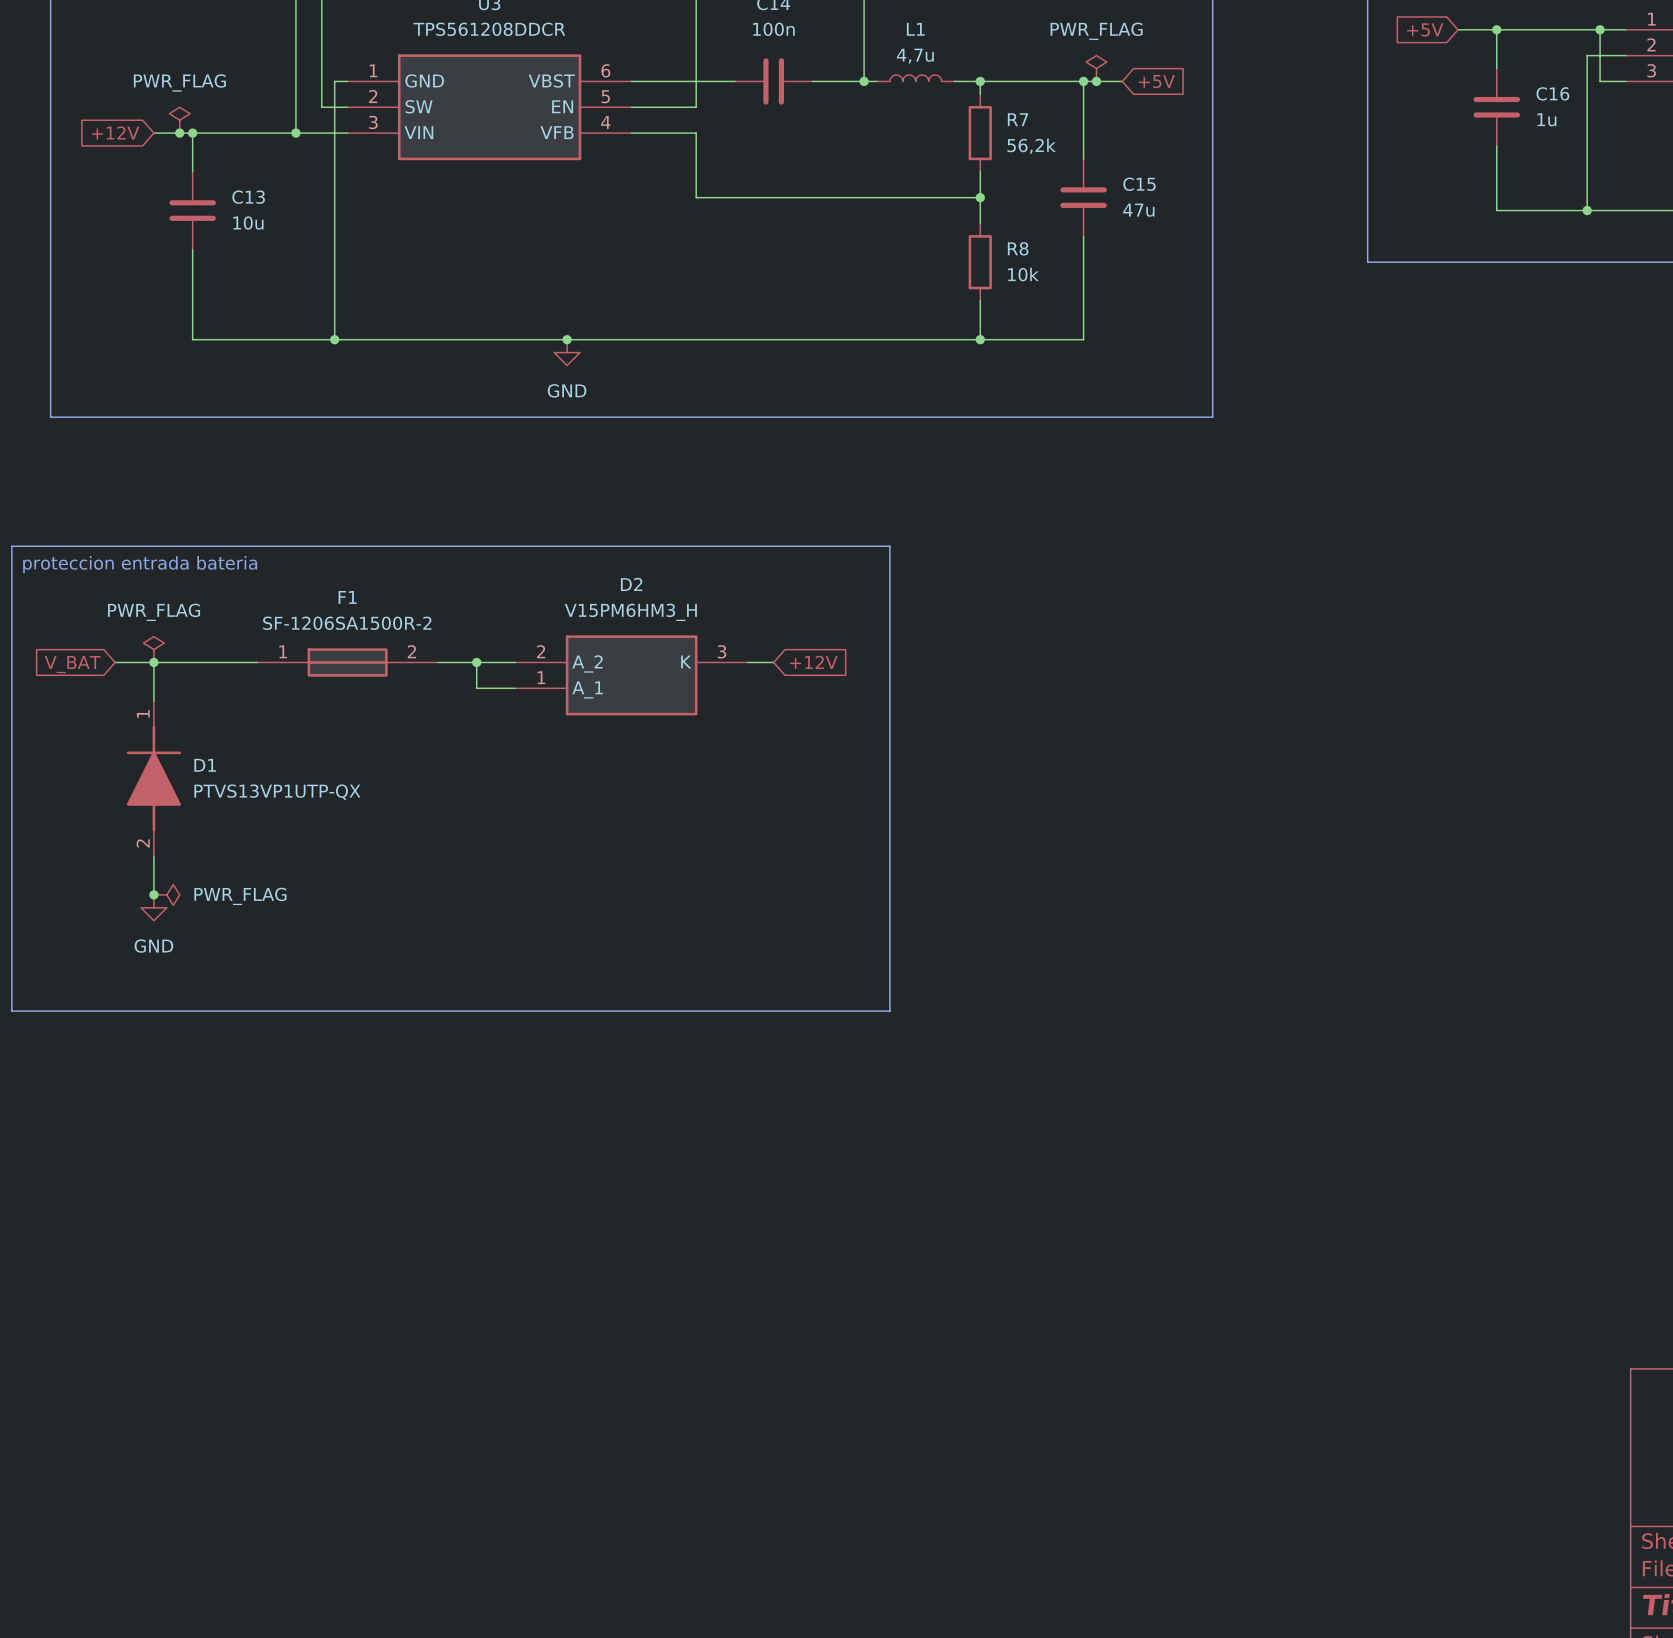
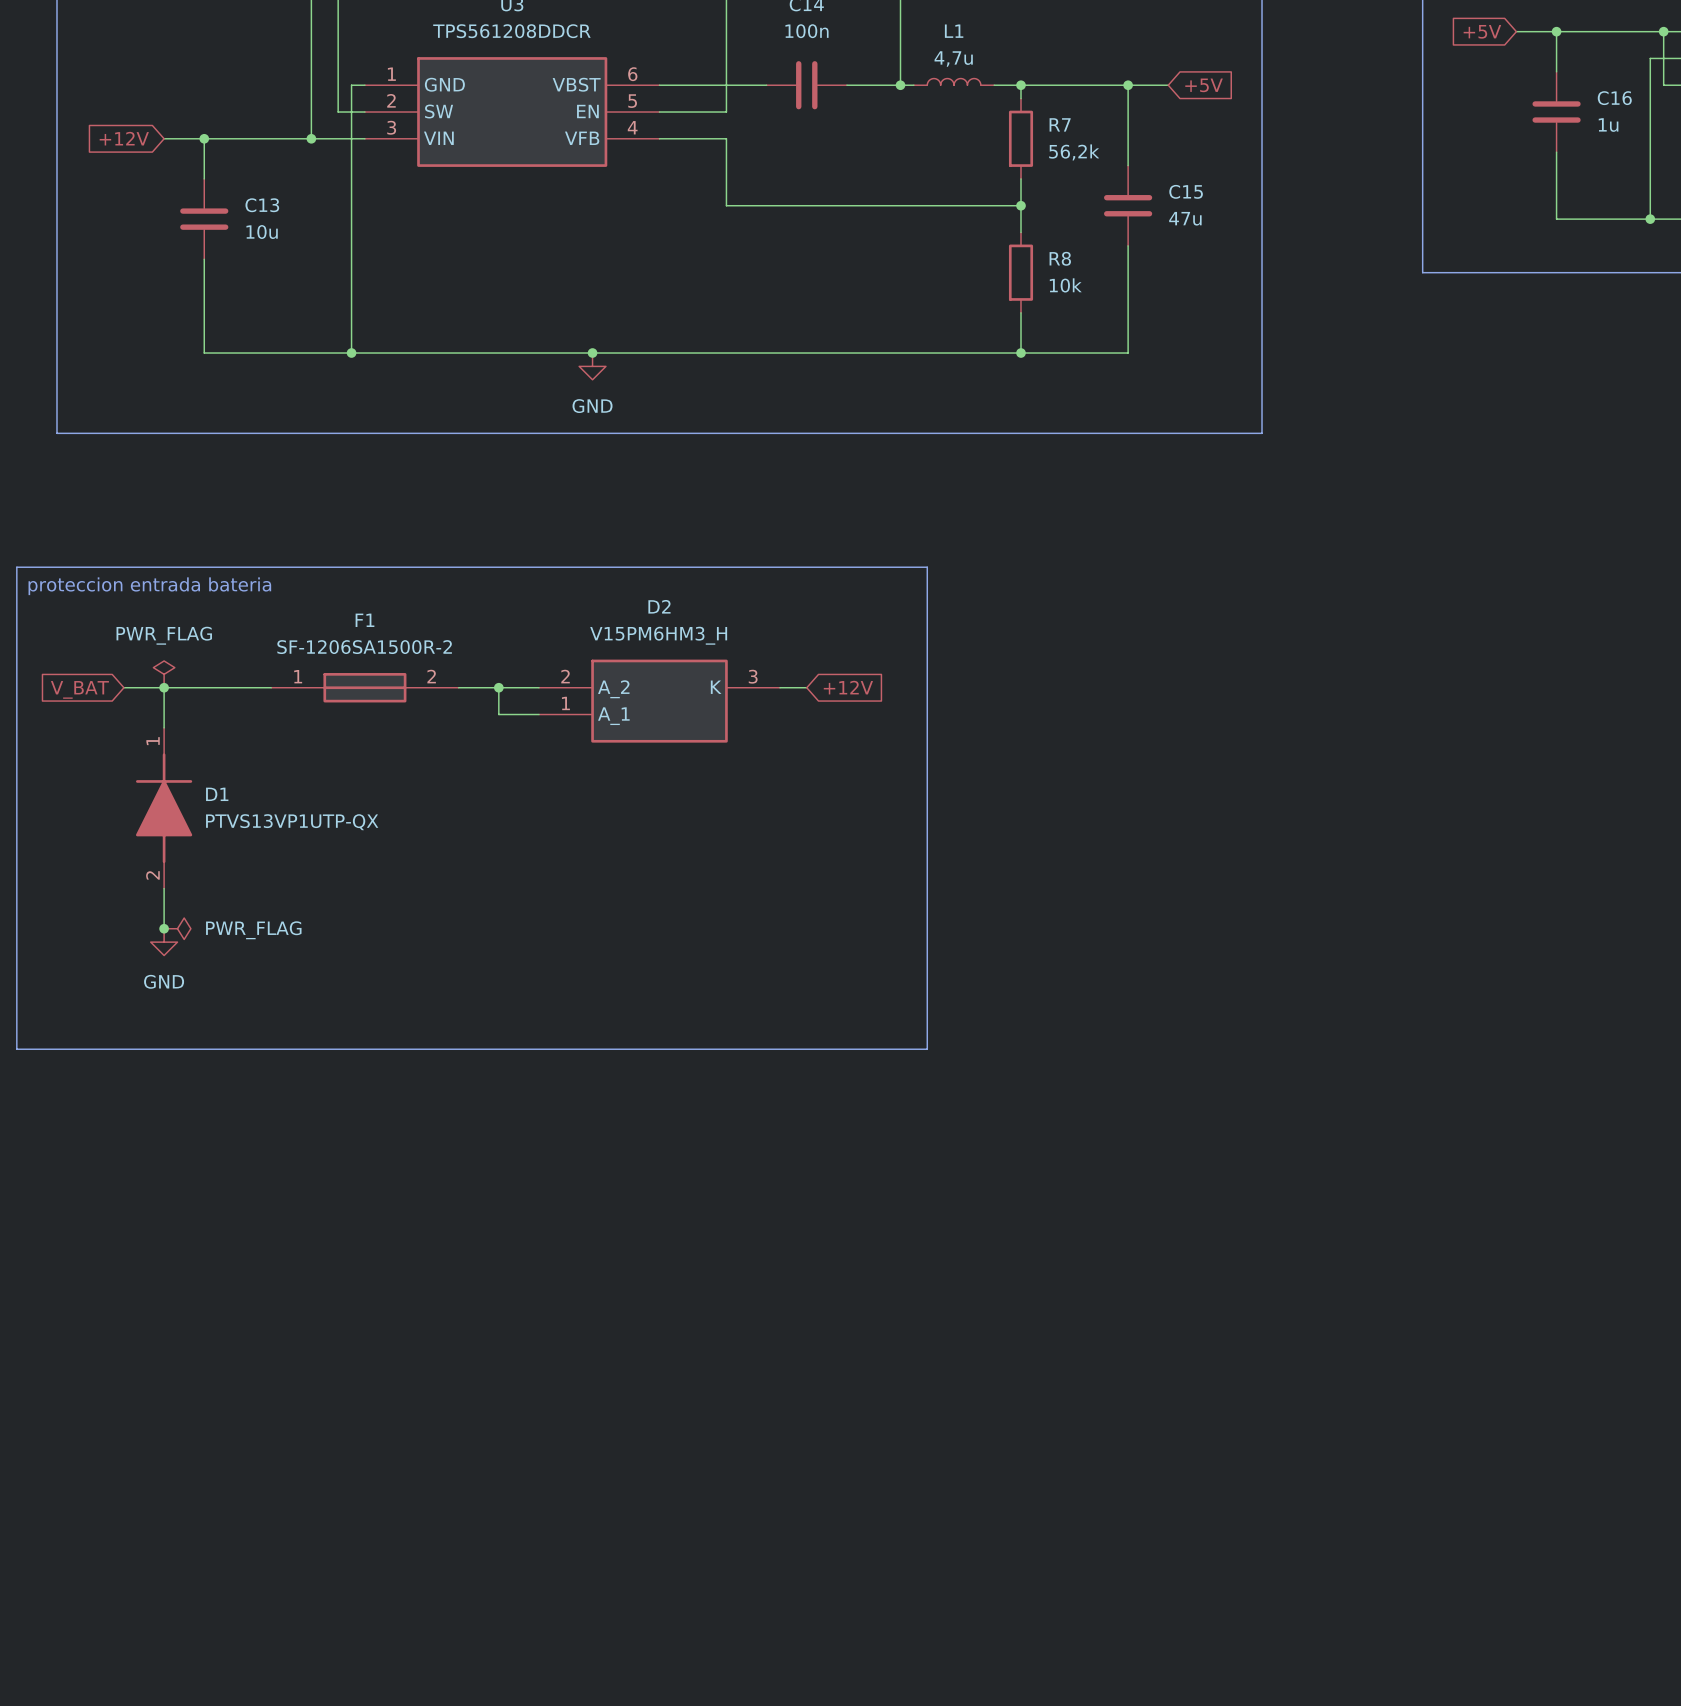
power symbol: PWR_FLAG (1096, 68) -> none
junction: (1096, 81) -> none
power symbol: PWR_FLAG (179, 120) -> none
junction: (179, 133) -> none

